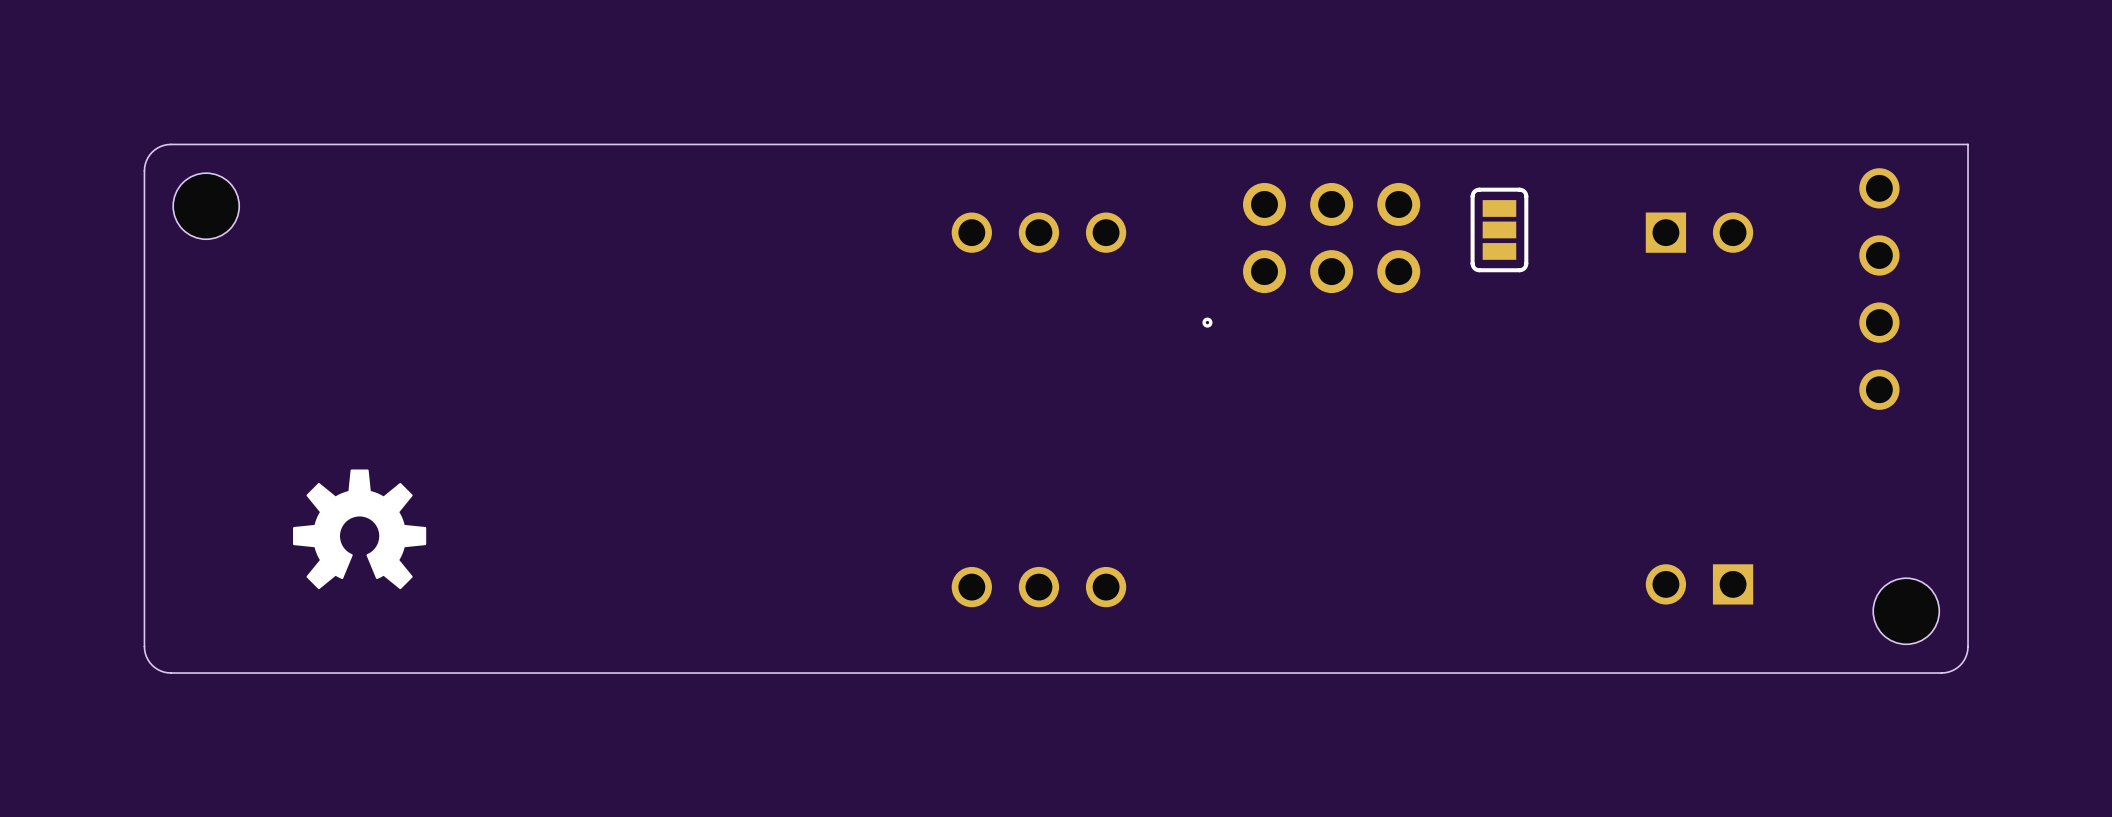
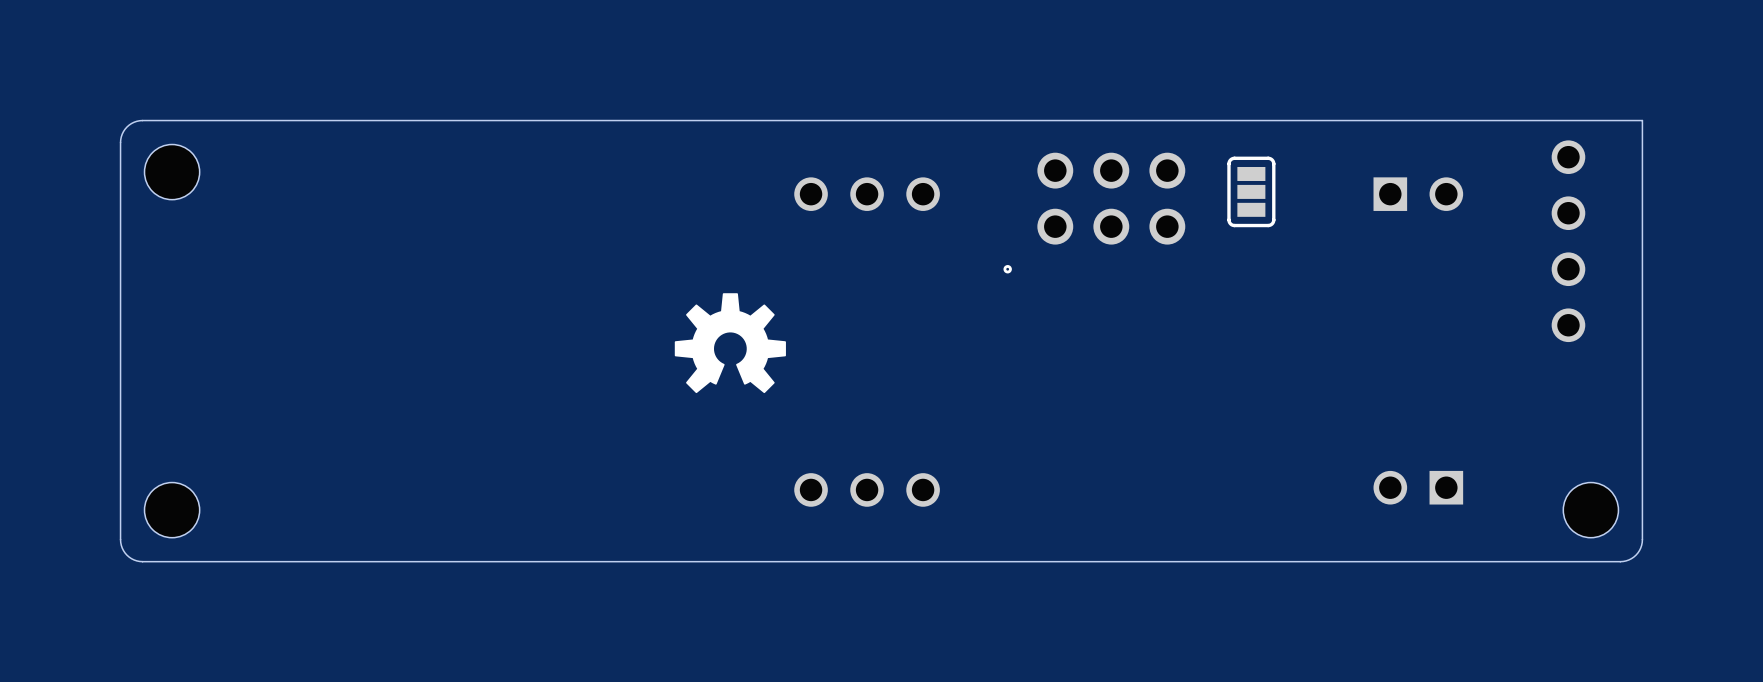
drawing position: (359, 529) -> (730, 343)
part: none -> (172, 510)

